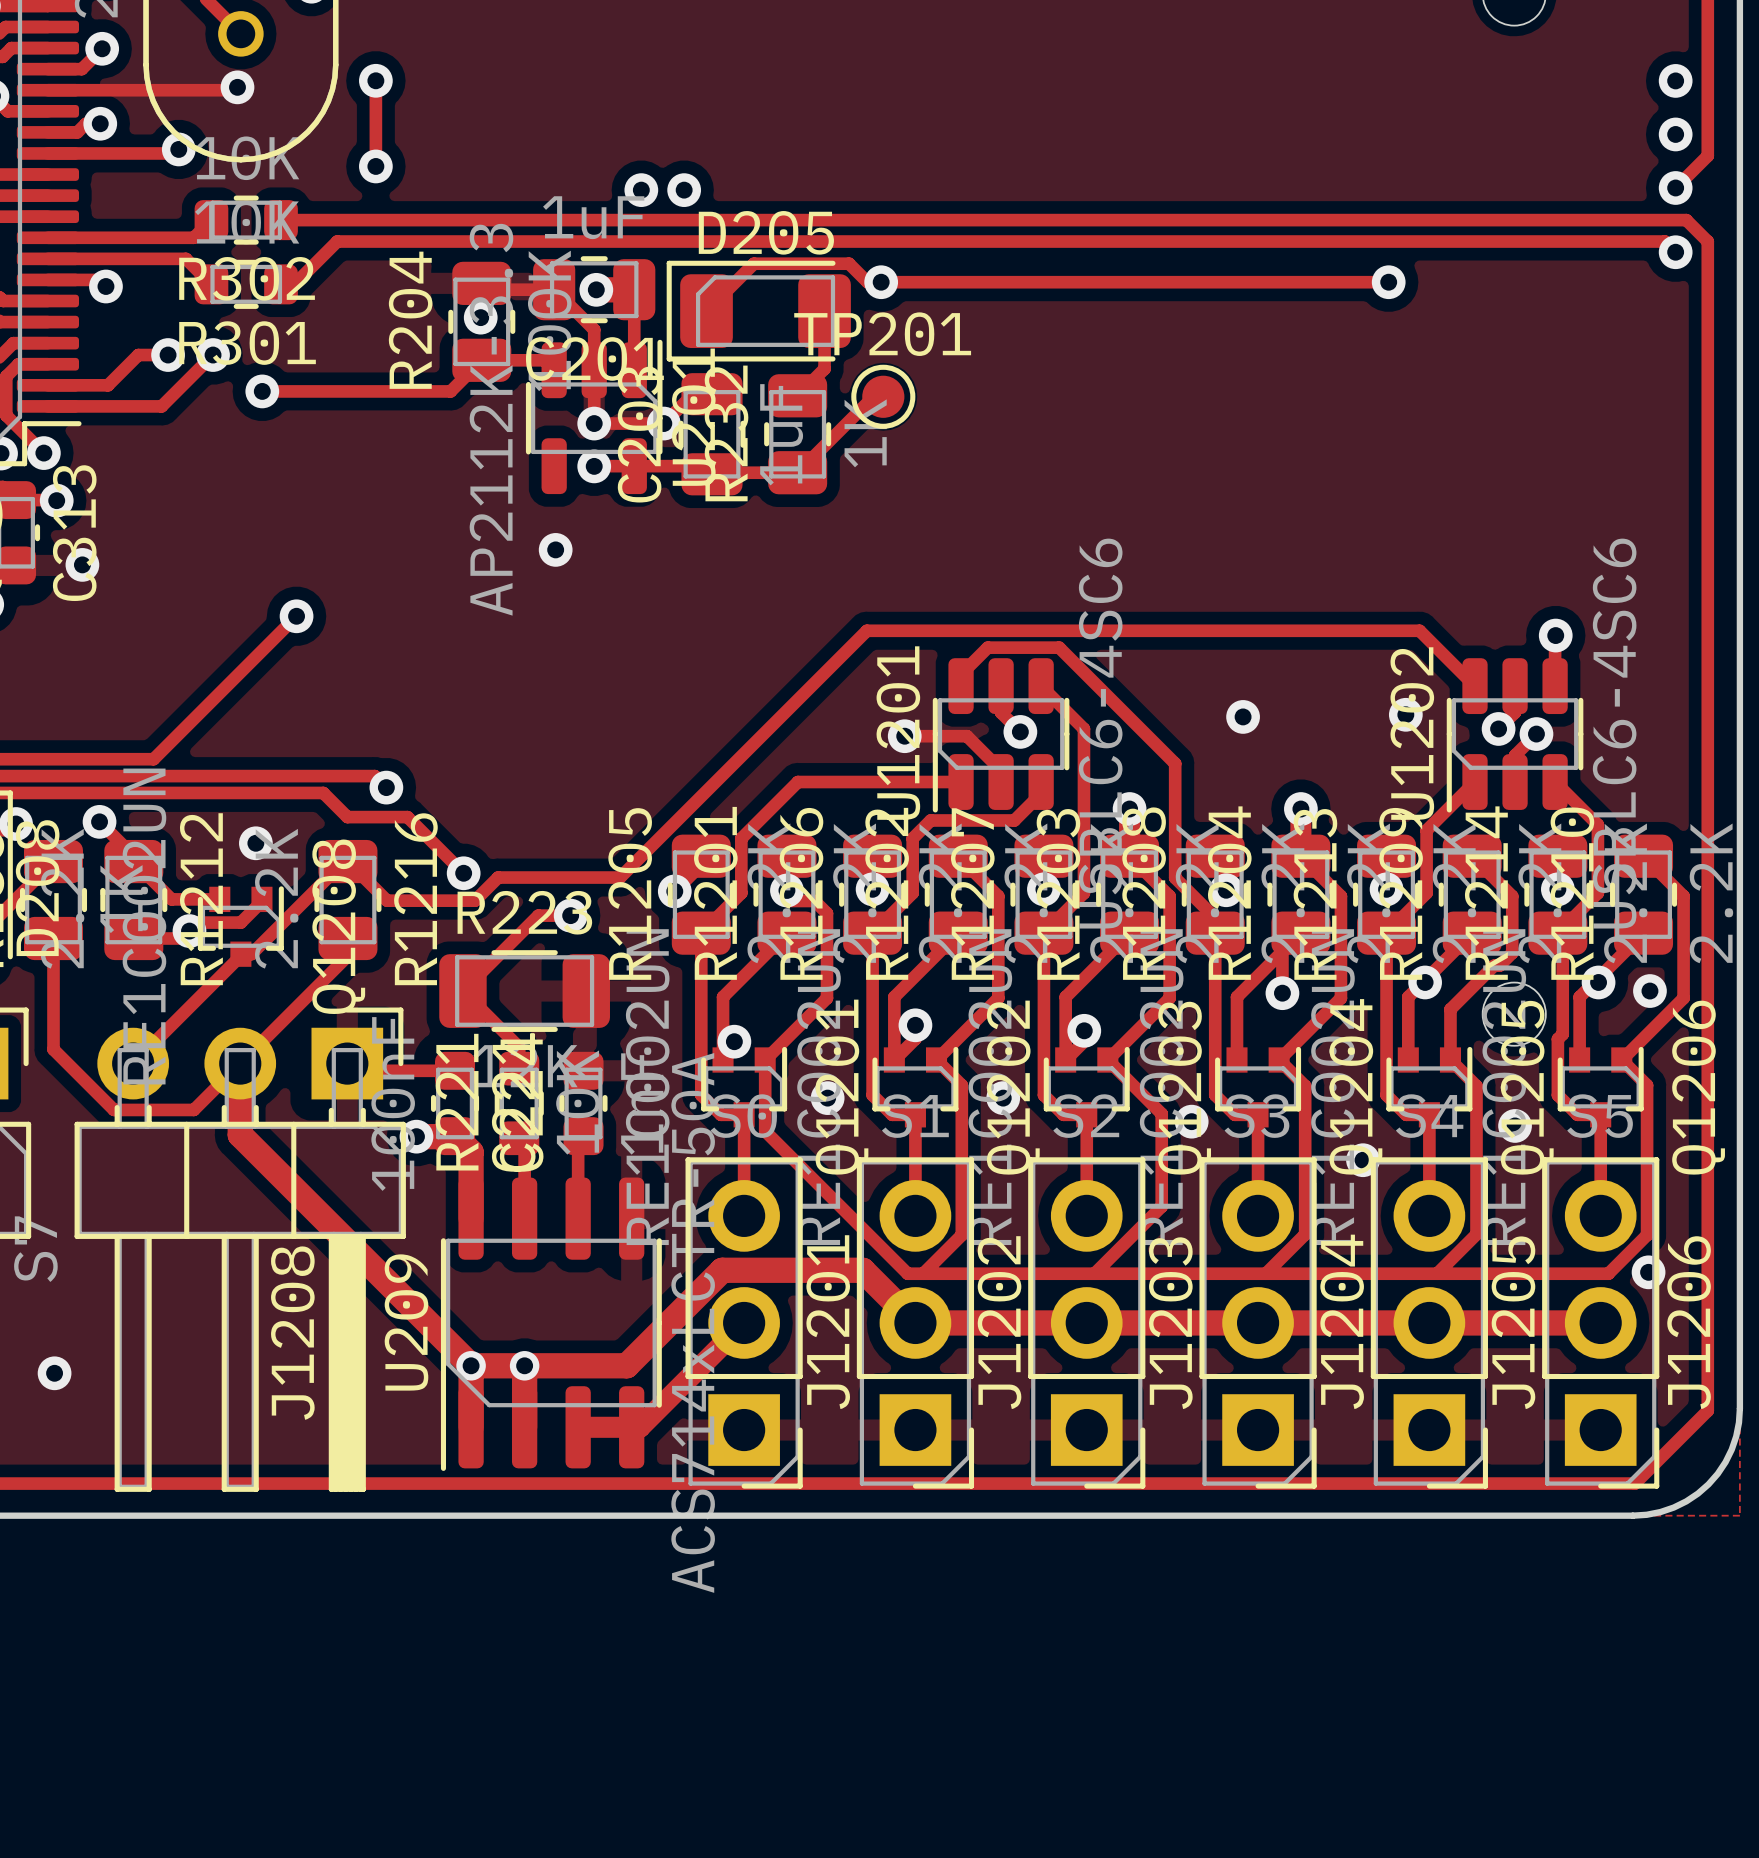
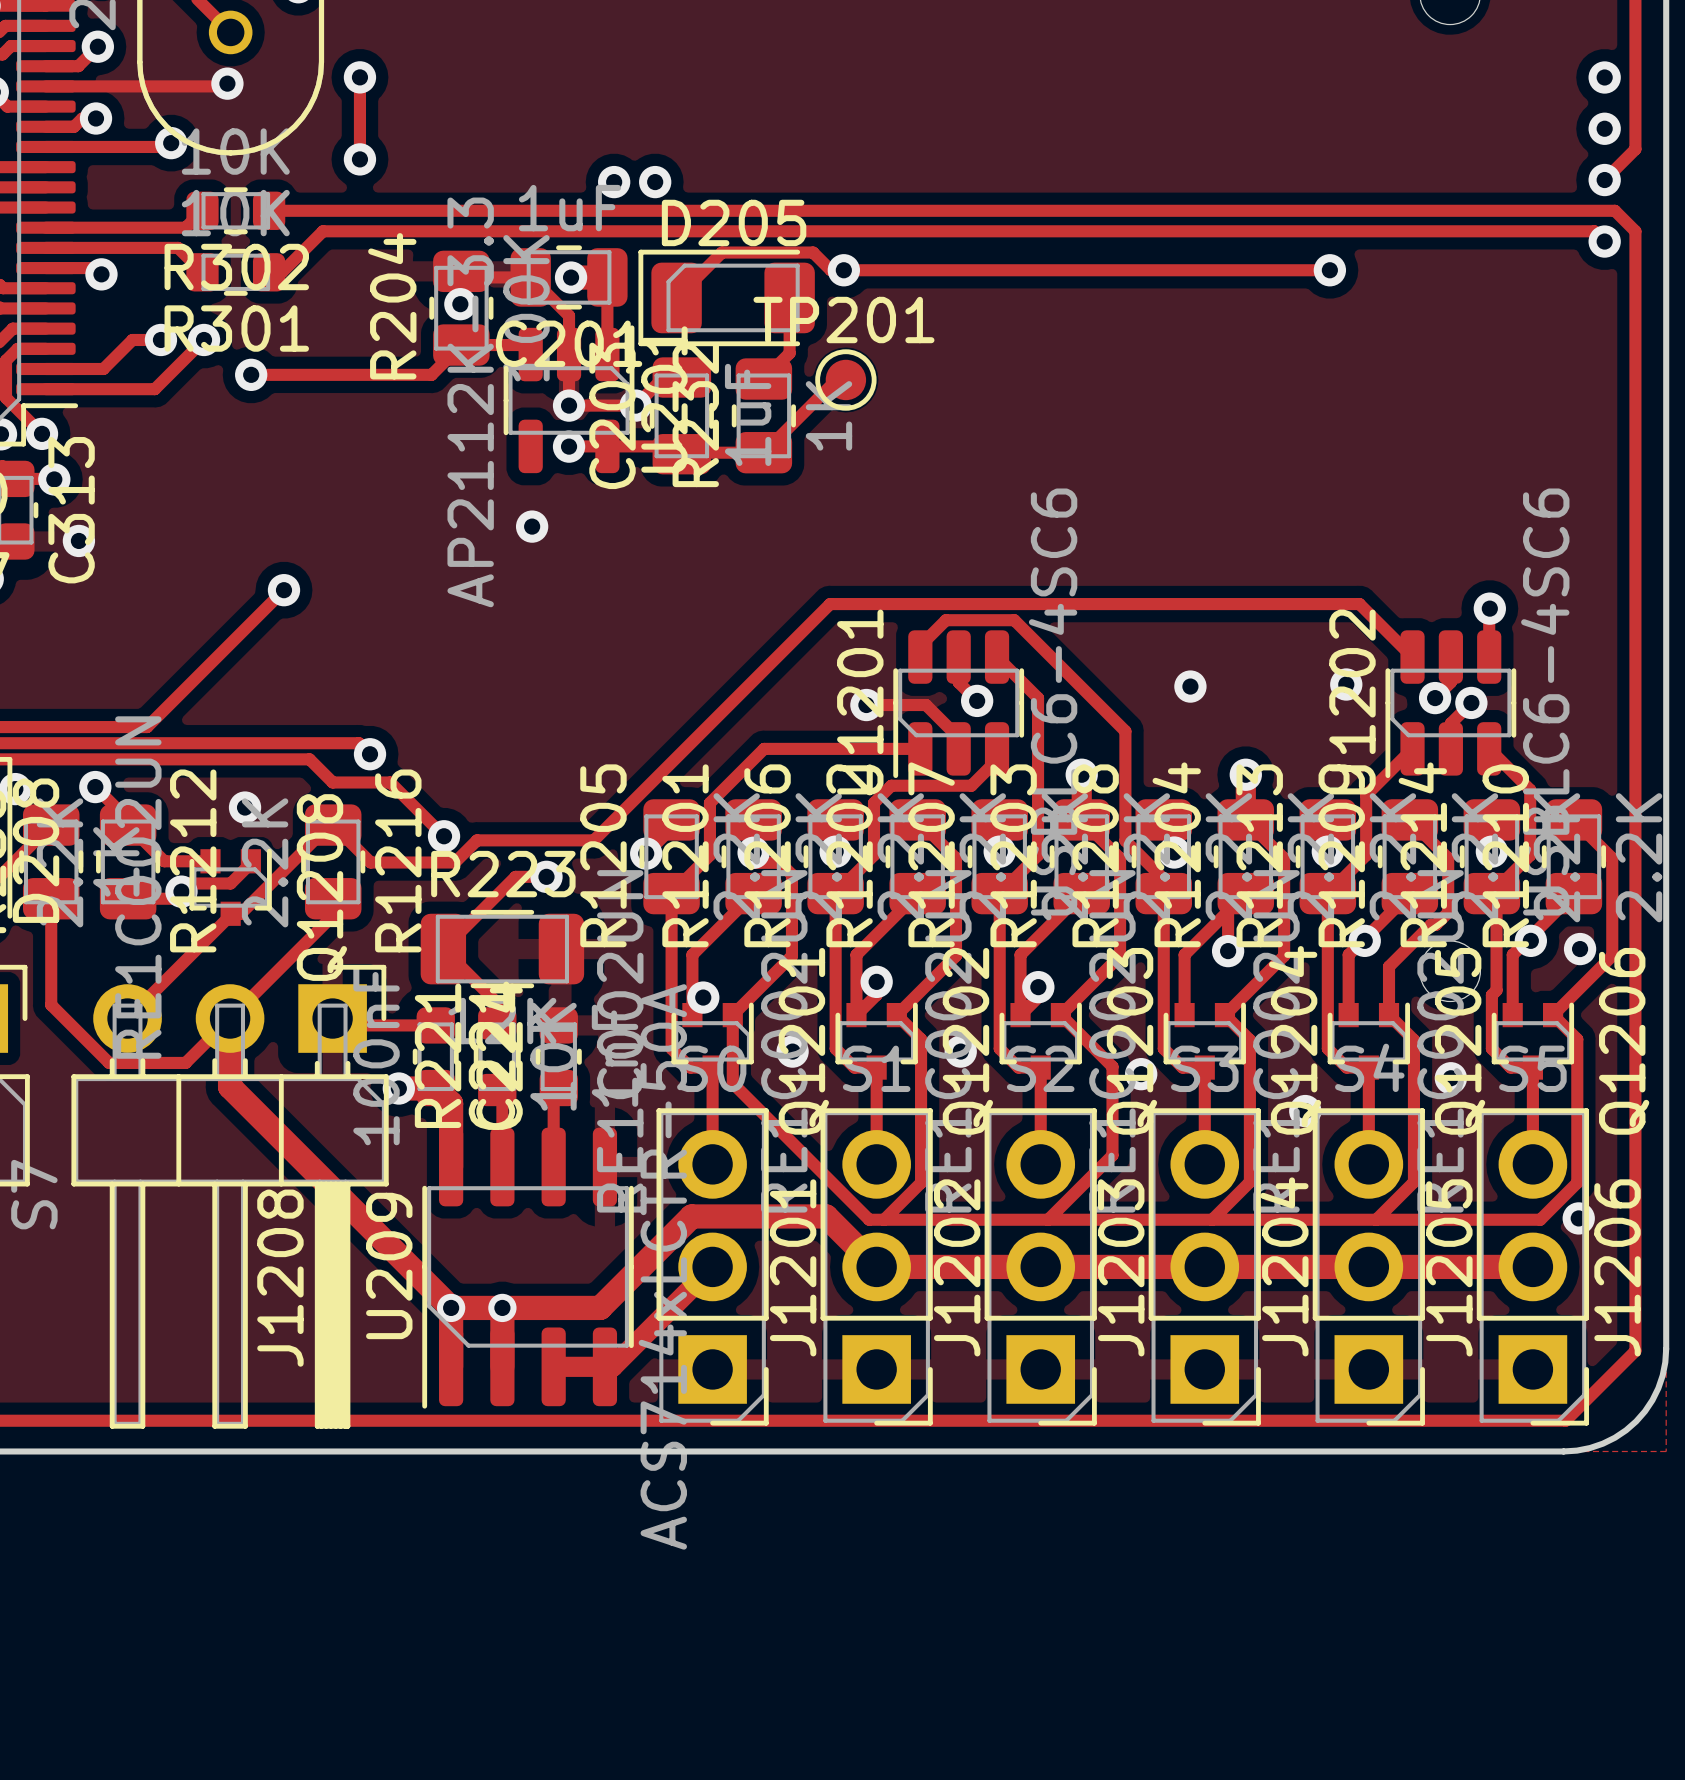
via: (54, 1373) -> none

